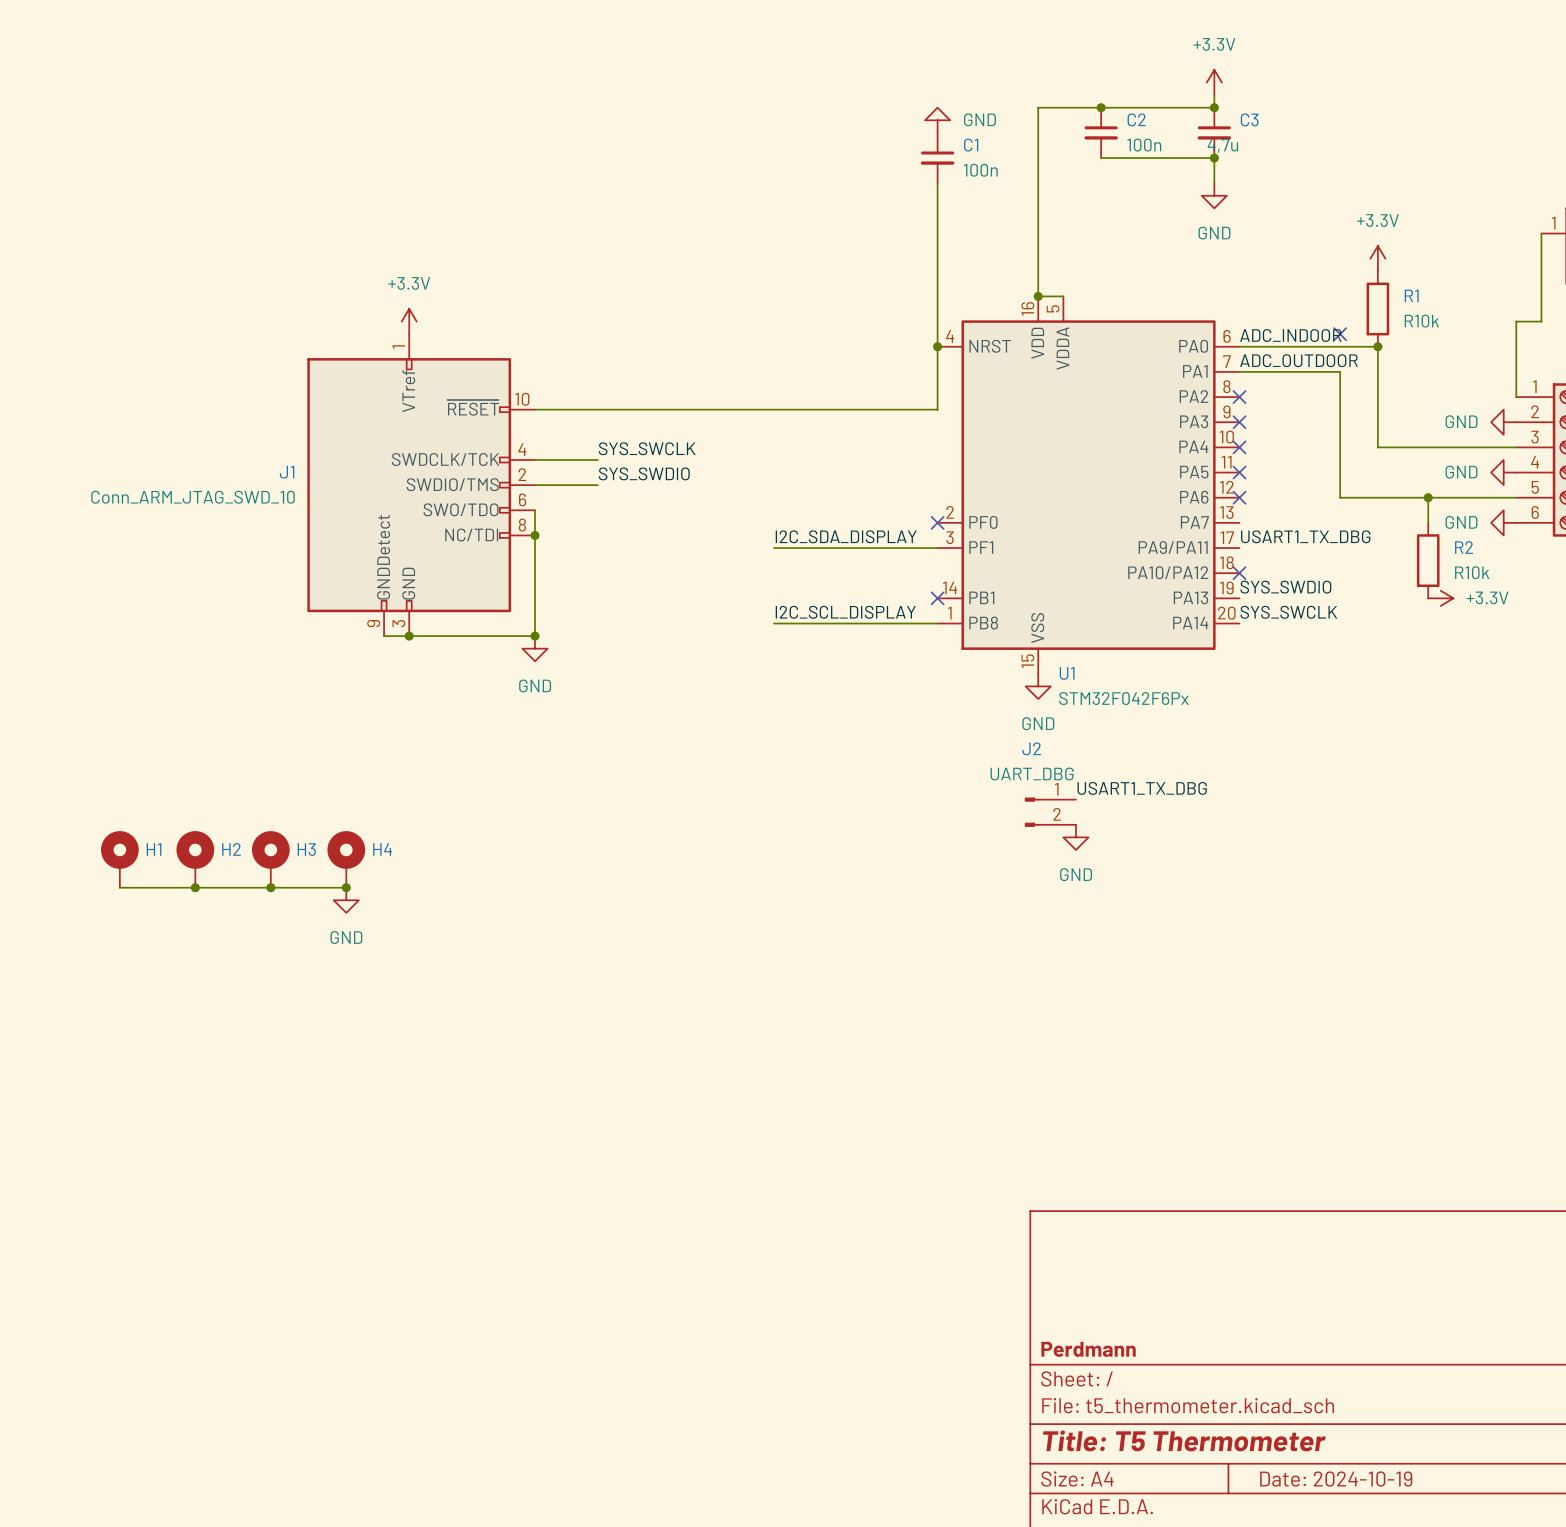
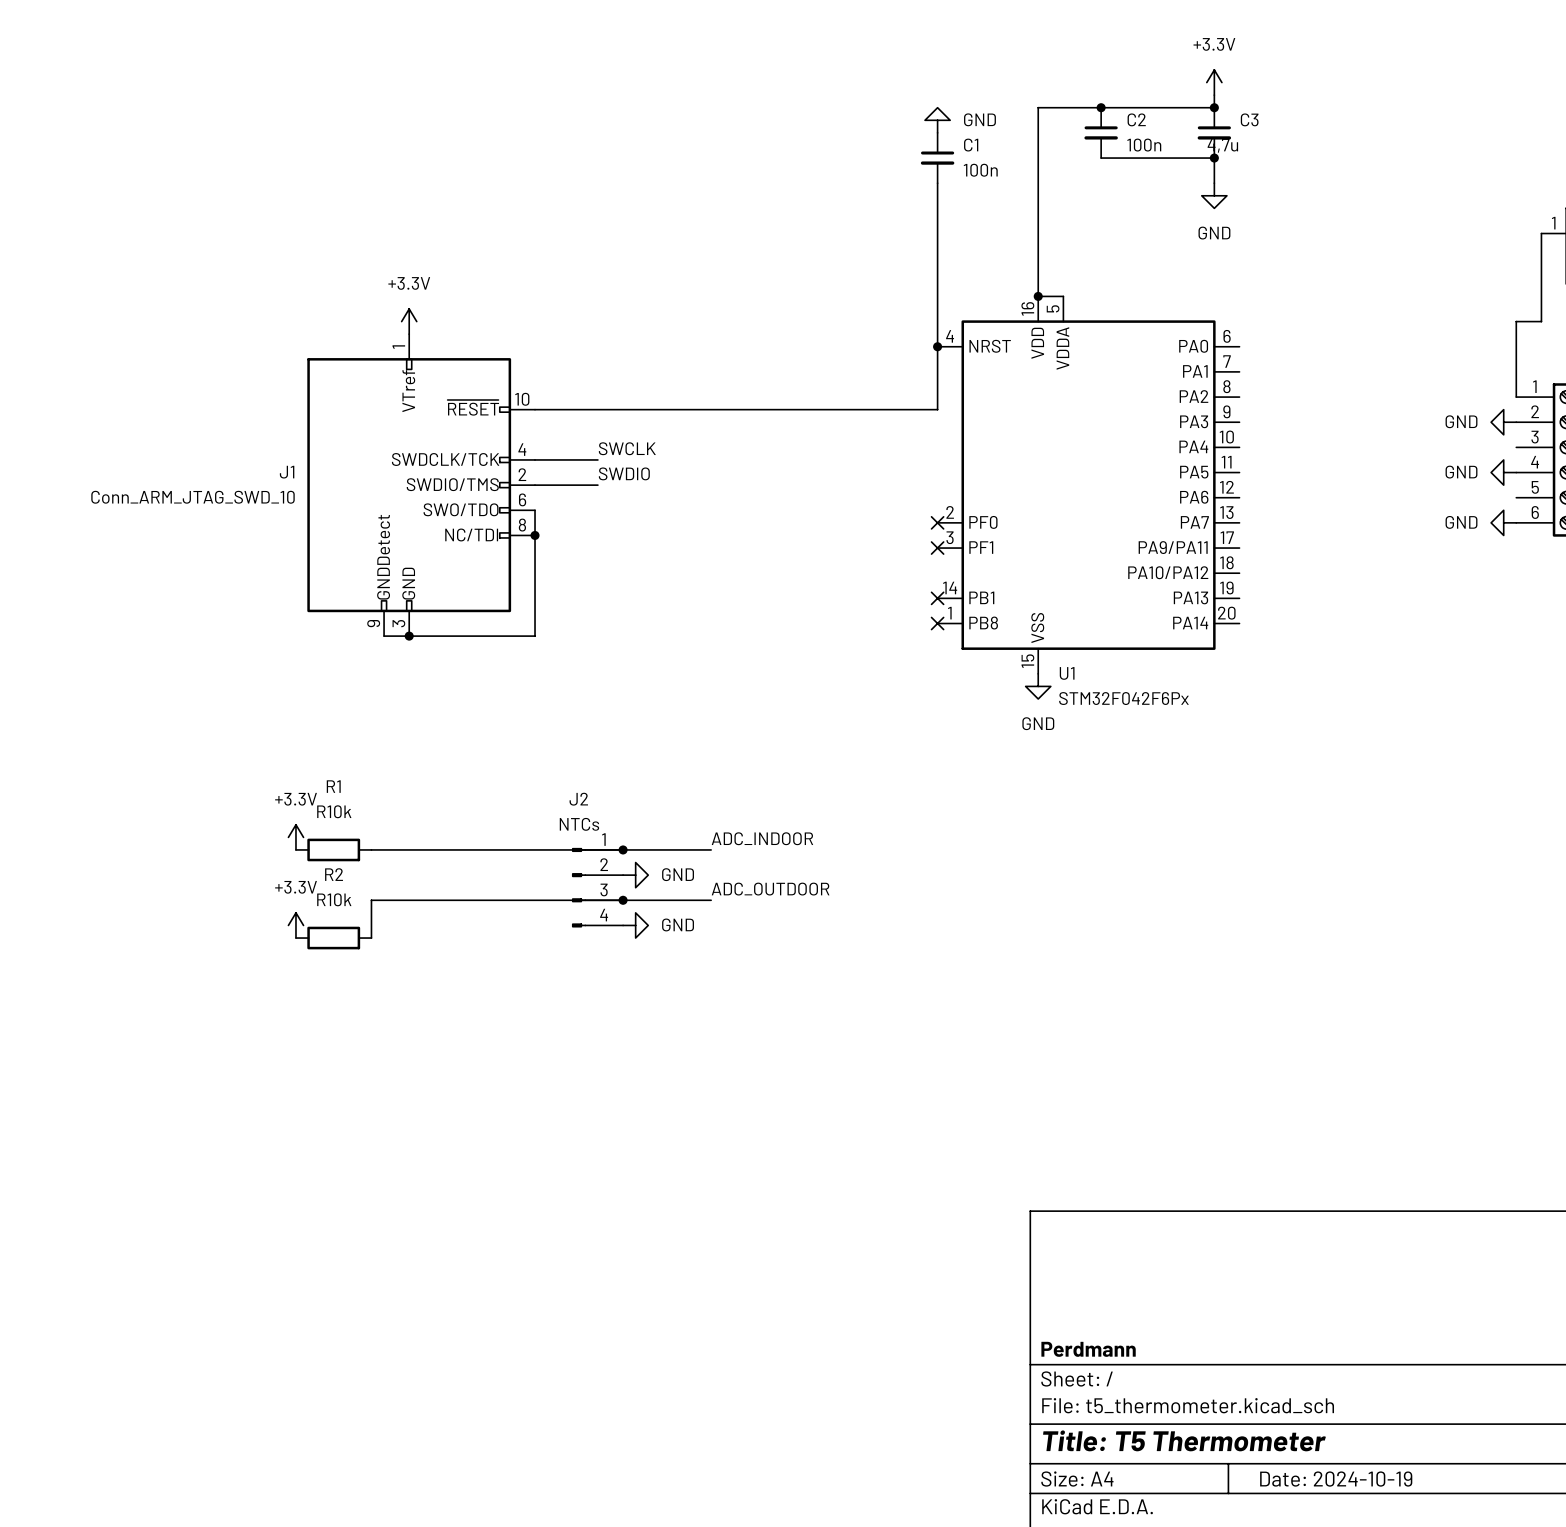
power symbol: +3.3V (1377, 258) -> none
R1 name position: R1 (1411, 295) -> R1 (333, 786)
R1 rotation: 0° (1377, 309) -> 90° clockwise (333, 849)
R1 position: (1377, 309) -> (333, 849)
R1 value position: R10k (1421, 321) -> R10k (334, 811)
no-connect mark: (1340, 334) -> none
label: ADC_INDOOR (1290, 335) -> none
wire: (1239, 346) (1377, 346) (1377, 447) (1516, 447) -> none
junction: (1377, 346) -> none
label: ADC_OUTDOOR (1298, 360) -> none
wire: (1239, 371) (1340, 371) (1340, 497) (1516, 497) -> none
no-connect mark: (1239, 397) -> none
no-connect mark: (1239, 422) -> none
no-connect mark: (1239, 447) -> none
label: SYS_SWCLK (647, 448) -> SWCLK (627, 448)
no-connect mark: (1239, 472) -> none
label: SYS_SWDIO (644, 473) -> SWDIO (624, 473)
no-connect mark: (1239, 497) -> none
wire: (1428, 497) (1428, 522) -> none
junction: (1428, 497) -> none
label: I2C_SDA_DISPLAY (846, 536) -> none
label: USART1_TX_DBG (1305, 536) -> none
R2 name position: R2 (1464, 547) -> R2 (334, 874)
wire: (774, 548) (937, 548) -> none
no-connect mark: none -> (937, 548)
R2 rotation: 0° (1428, 560) -> 90° clockwise (333, 938)
R2 position: (1428, 560) -> (333, 938)
R2 value position: R10k (1472, 572) -> R10k (334, 899)
no-connect mark: (1239, 573) -> none
label: SYS_SWDIO (1285, 587) -> none
power symbol: +3.3V (1440, 598) -> none
label: I2C_SCL_DISPLAY (845, 612) -> none
label: SYS_SWCLK (1288, 612) -> none
wire: (774, 623) (937, 623) -> none
no-connect mark: none -> (937, 623)
junction: (535, 636) -> none
power symbol: GND (535, 648) -> none
J2 name position: J2 (1031, 748) -> J2 (578, 799)
J2 value: UART_DBG (1032, 774) -> NTCs (579, 824)
label: USART1_TX_DBG (1142, 788) -> none
J2 symbol: [1024, 797, 1076, 827] -> [572, 847, 624, 928]
power symbol: none -> +3.3V (295, 837)
power symbol: GND (1075, 837) -> none
label: none -> ADC_INDOOR (762, 838)
wire: none -> (371, 849) (711, 849)
junction: none -> (623, 849)
H1: (119, 859) -> none
H2: (195, 859) -> none
H3: (270, 859) -> none
H4: (346, 859) -> none
power symbol: none -> GND (635, 875)
wire: (119, 887) (346, 887) -> none
junction: (195, 887) -> none
junction: (270, 887) -> none
junction: (346, 887) -> none
label: none -> ADC_OUTDOOR (770, 889)
power symbol: GND (346, 900) -> none
junction: none -> (623, 900)
wire: none -> (711, 900) (371, 900) (371, 938)
power symbol: none -> +3.3V (295, 925)
power symbol: none -> GND (635, 925)

